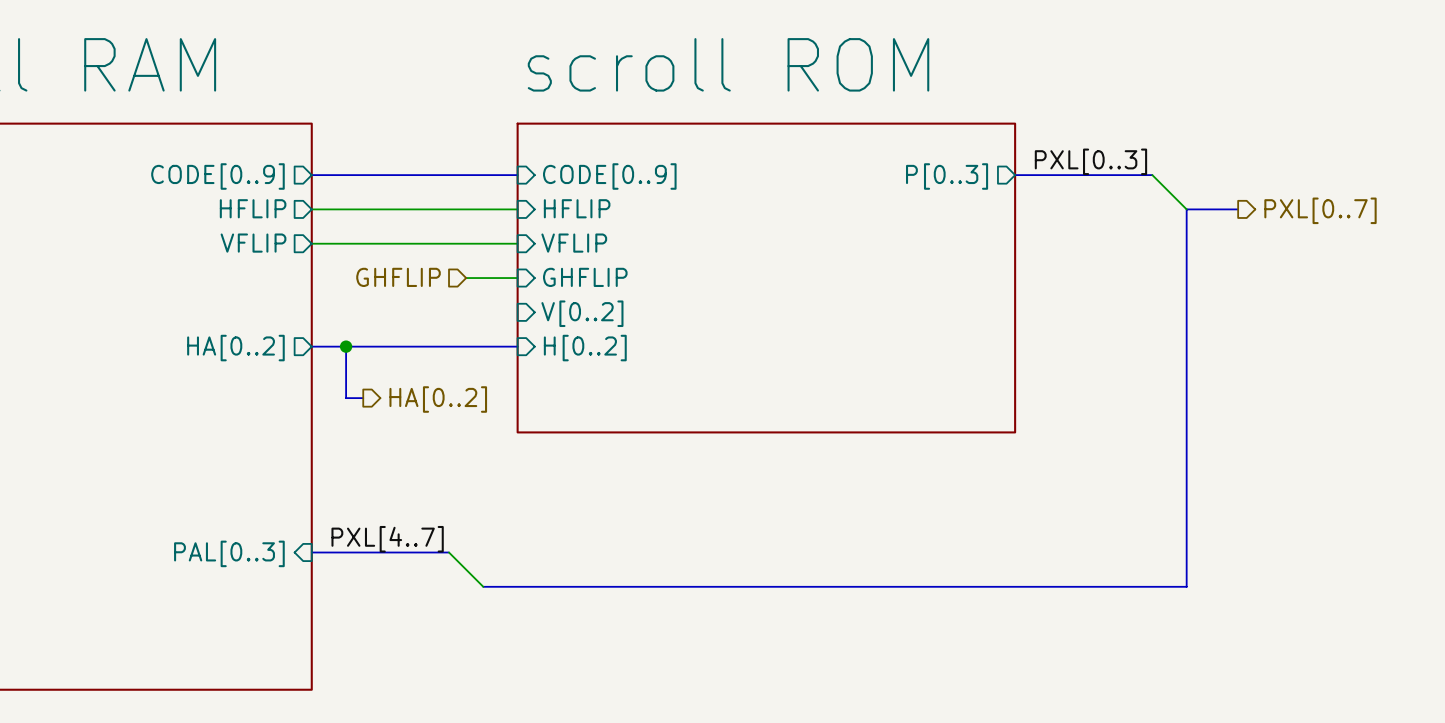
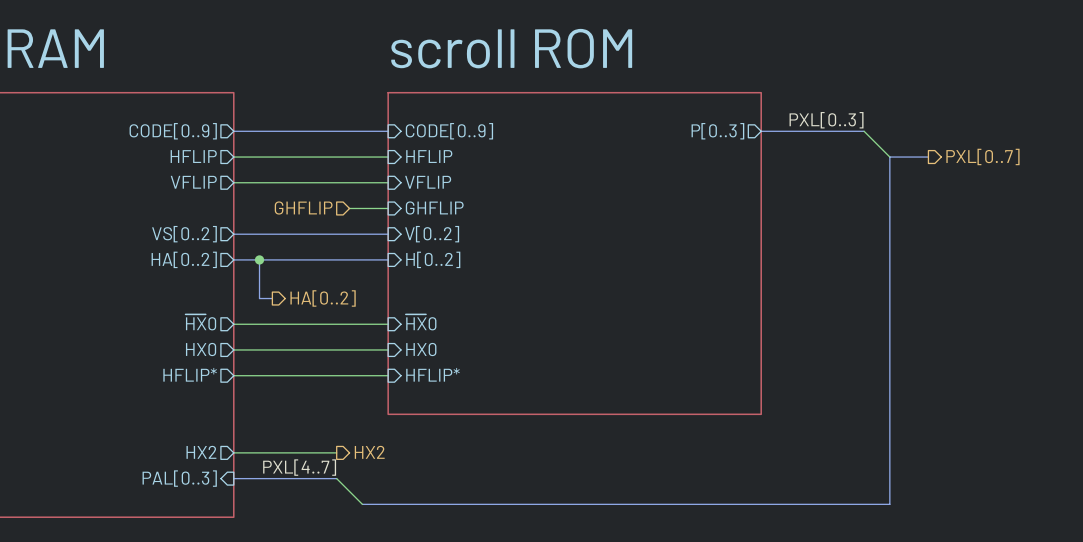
sheet scroll ROM: (766, 278) -> none
bus: none -> (233, 234) (388, 234)
sheet pin: none -> VS[0..2] (184, 234)
sheet scroll ROM: none -> (574, 253)
sheet pin: none -> ~{HX}0 (200, 322)
sheet pin: none -> ~{HX}0 (421, 322)
wire: none -> (233, 324) (388, 324)
sheet pin: none -> HX0 (201, 349)
wire: none -> (233, 349) (388, 349)
sheet pin: none -> HX0 (421, 349)
sheet pin: none -> HFLIP* (190, 374)
sheet pin: none -> HFLIP* (432, 374)
wire: none -> (233, 375) (388, 375)
label position: PXL[4..7] (387, 539) -> PXL[4..7] (299, 467)
bus: (311, 552) (449, 552) -> (233, 478) (336, 478)
wire: (449, 552) (483, 586) -> (336, 478) (362, 504)
sheet pin position: PAL[0..3] (229, 553) -> PAL[0..3] (179, 478)
bus: (483, 586) (1186, 586) -> (362, 504) (889, 504) (889, 440)
sheet pin: none -> HX2 (201, 452)
wire: none -> (233, 452) (336, 452)
hierarchical label: none -> HX2 (369, 452)

